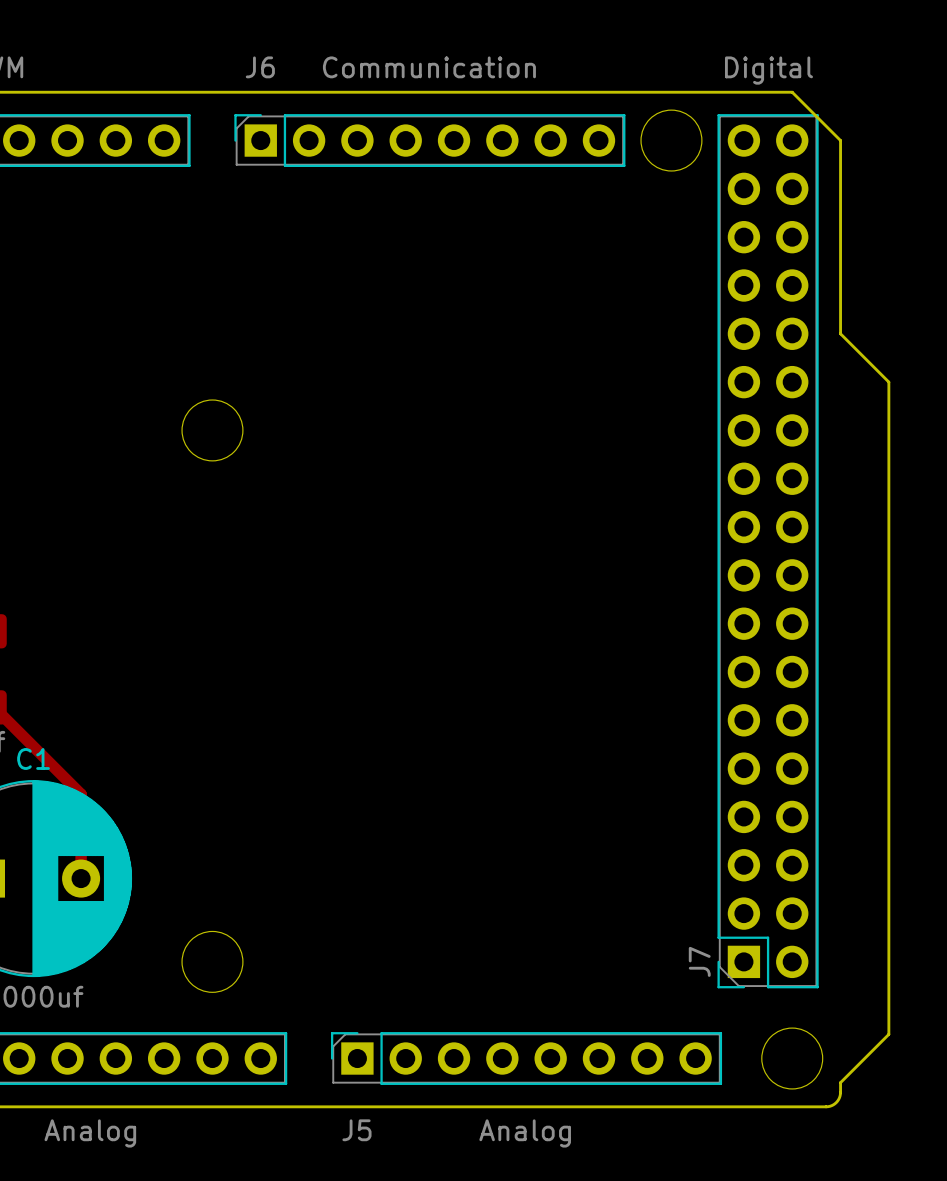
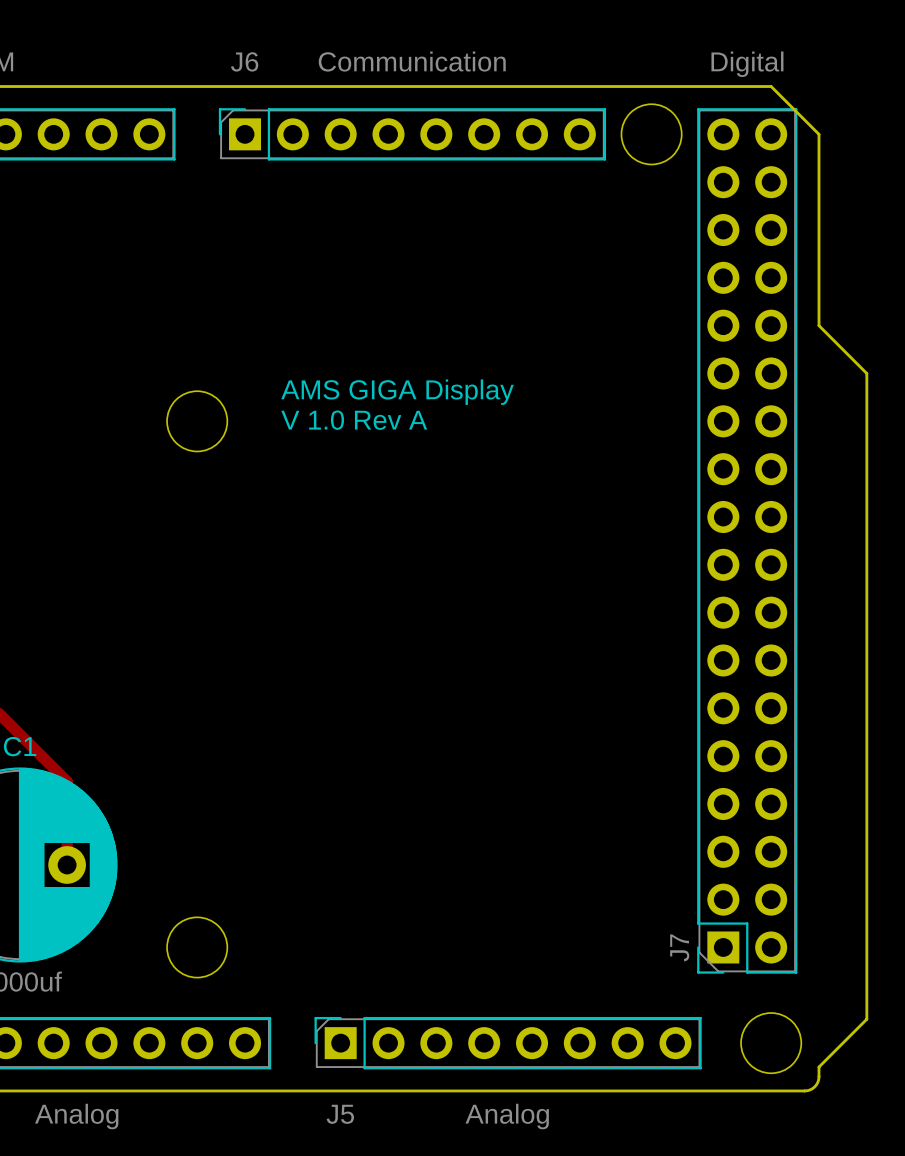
text: none -> AMS GIGA Display (397, 392)
text: none -> V 1.0 Rev A (354, 420)

